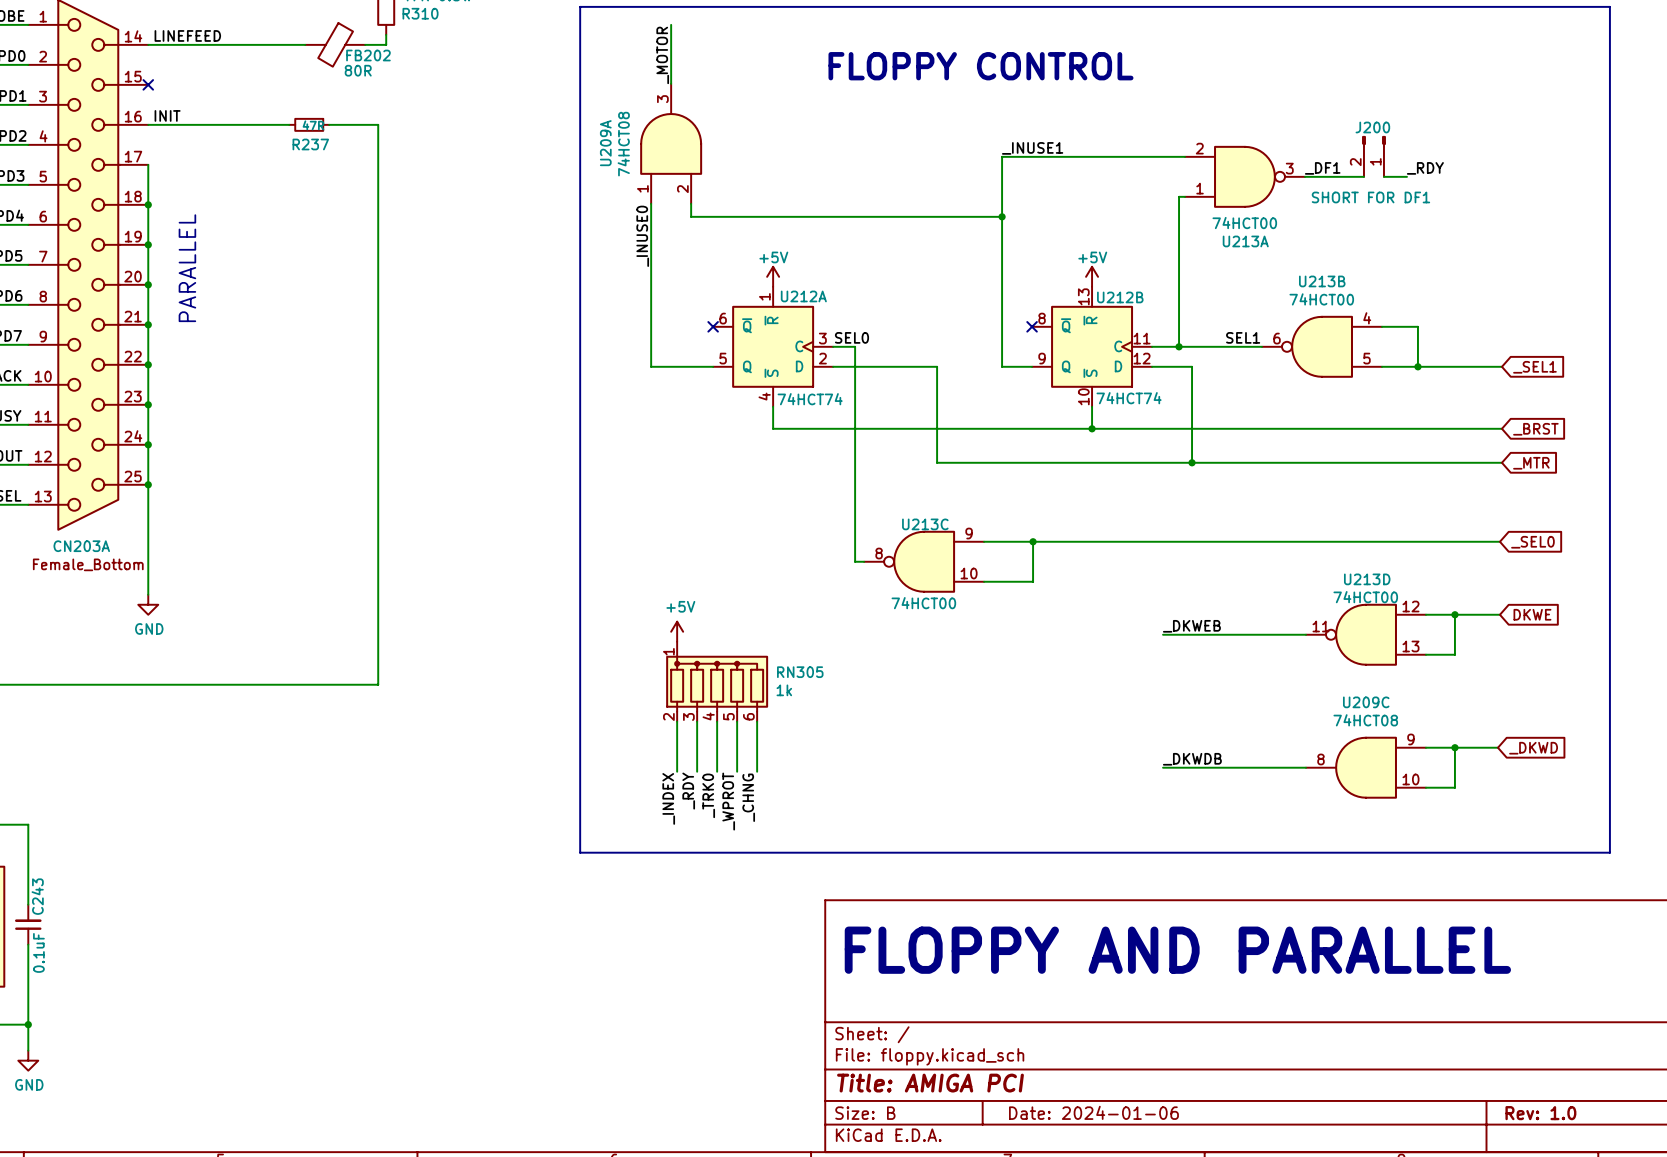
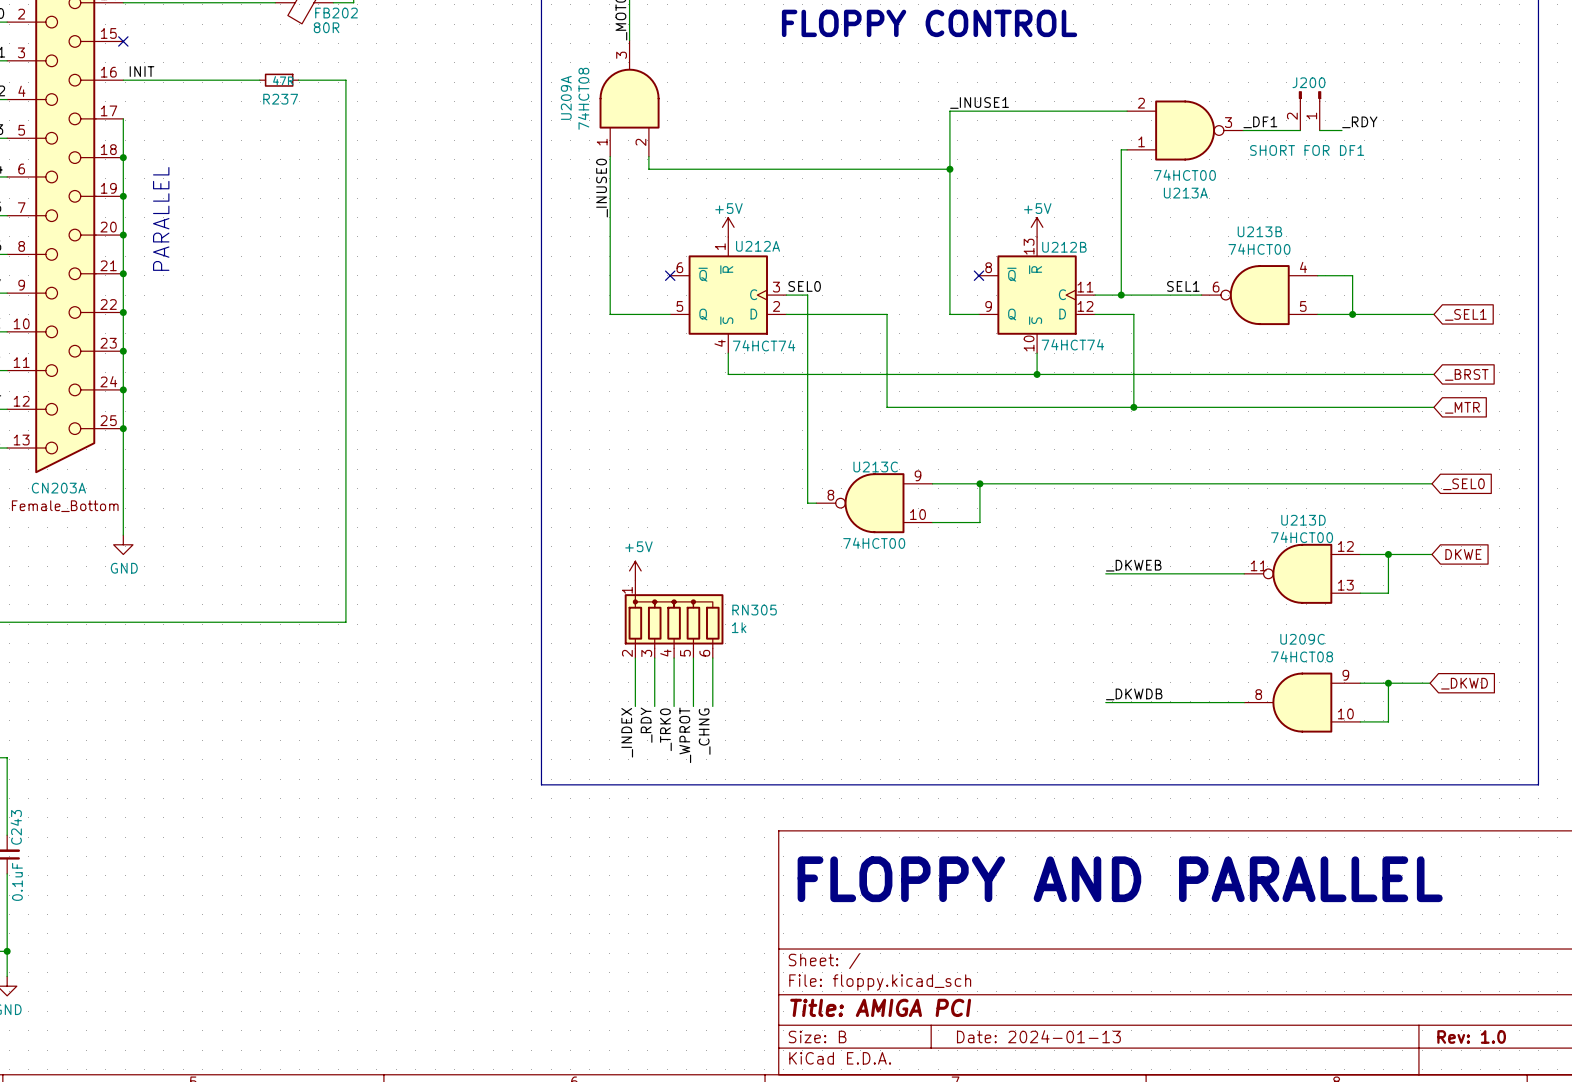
title block: Date: 2024-01-06 (1093, 1112) -> Date: 2024-01-13 (1038, 1036)

